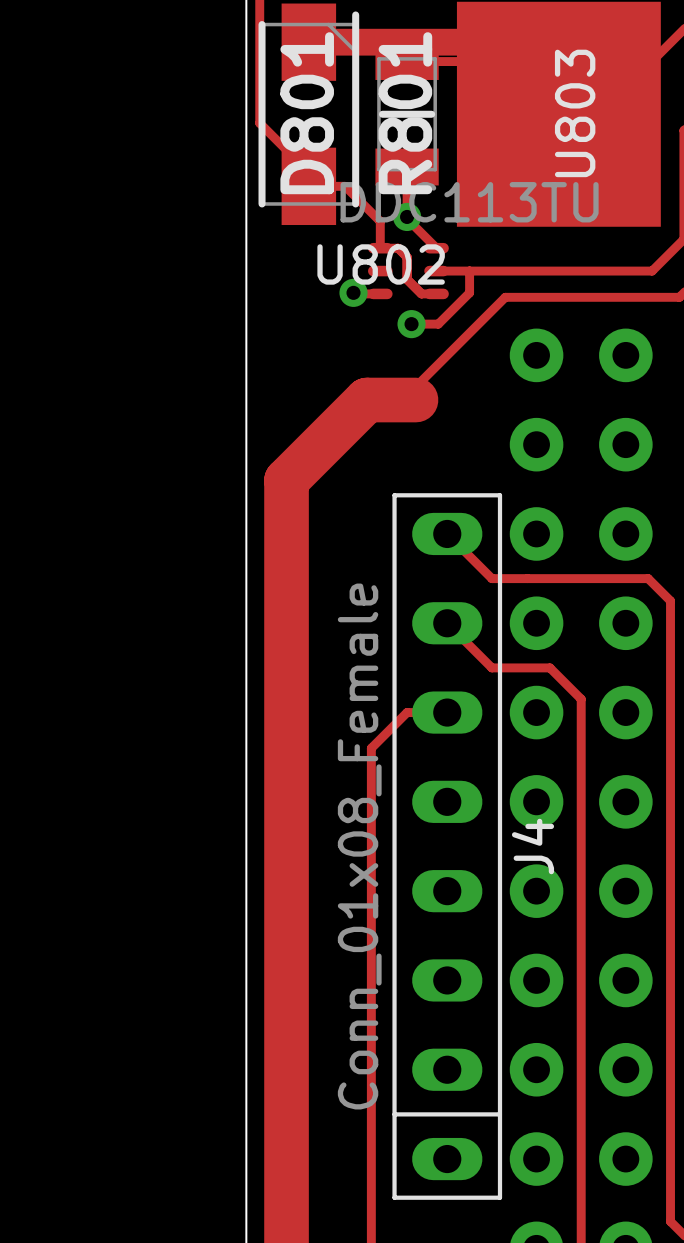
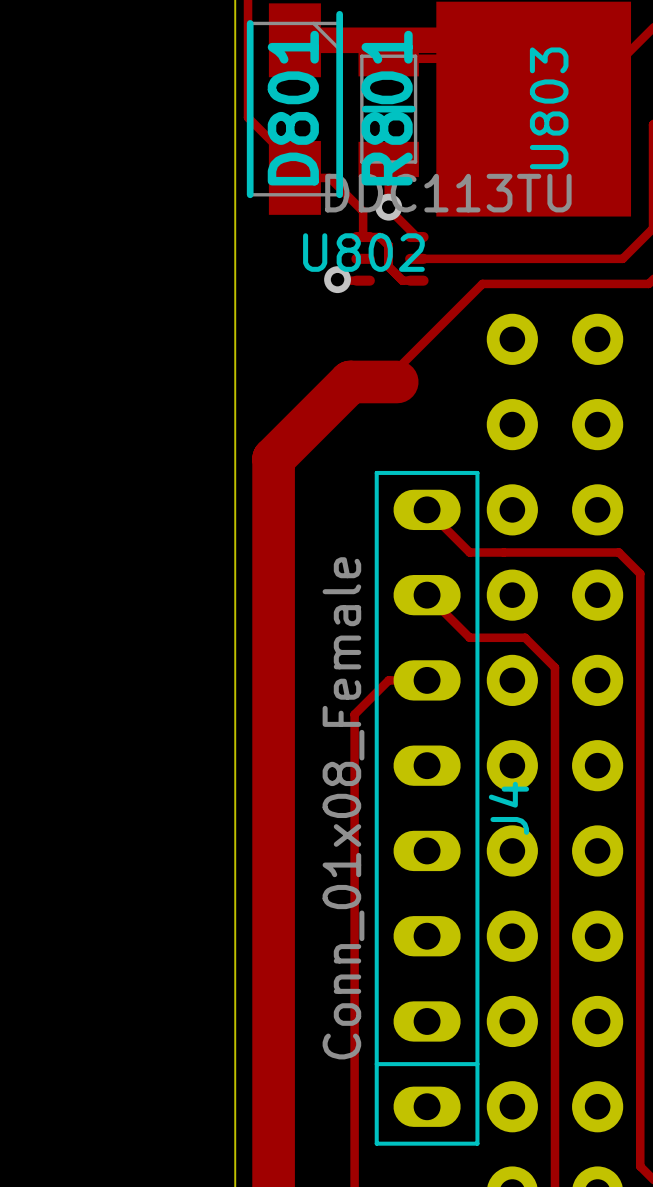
track: (469, 271) (469, 292) (438, 324) (411, 324) -> none
via: (411, 324) -> none

